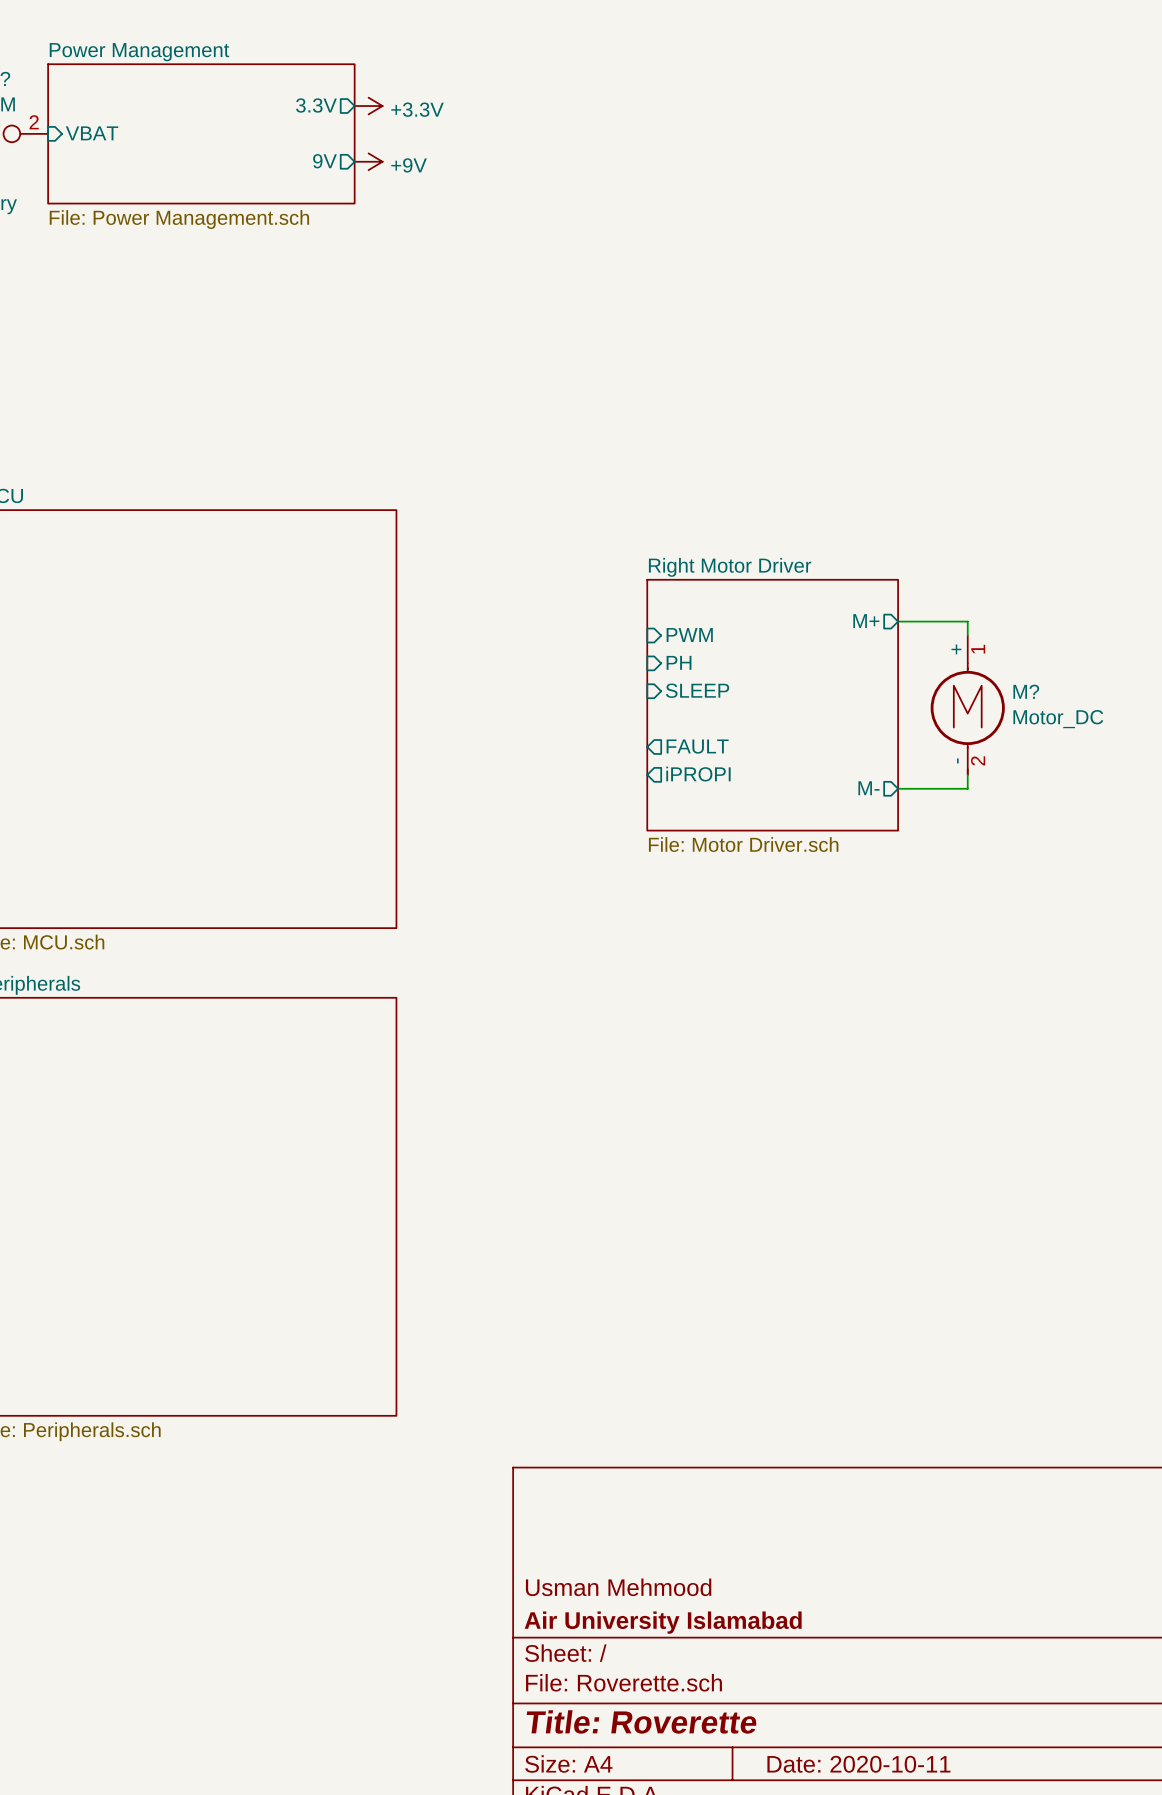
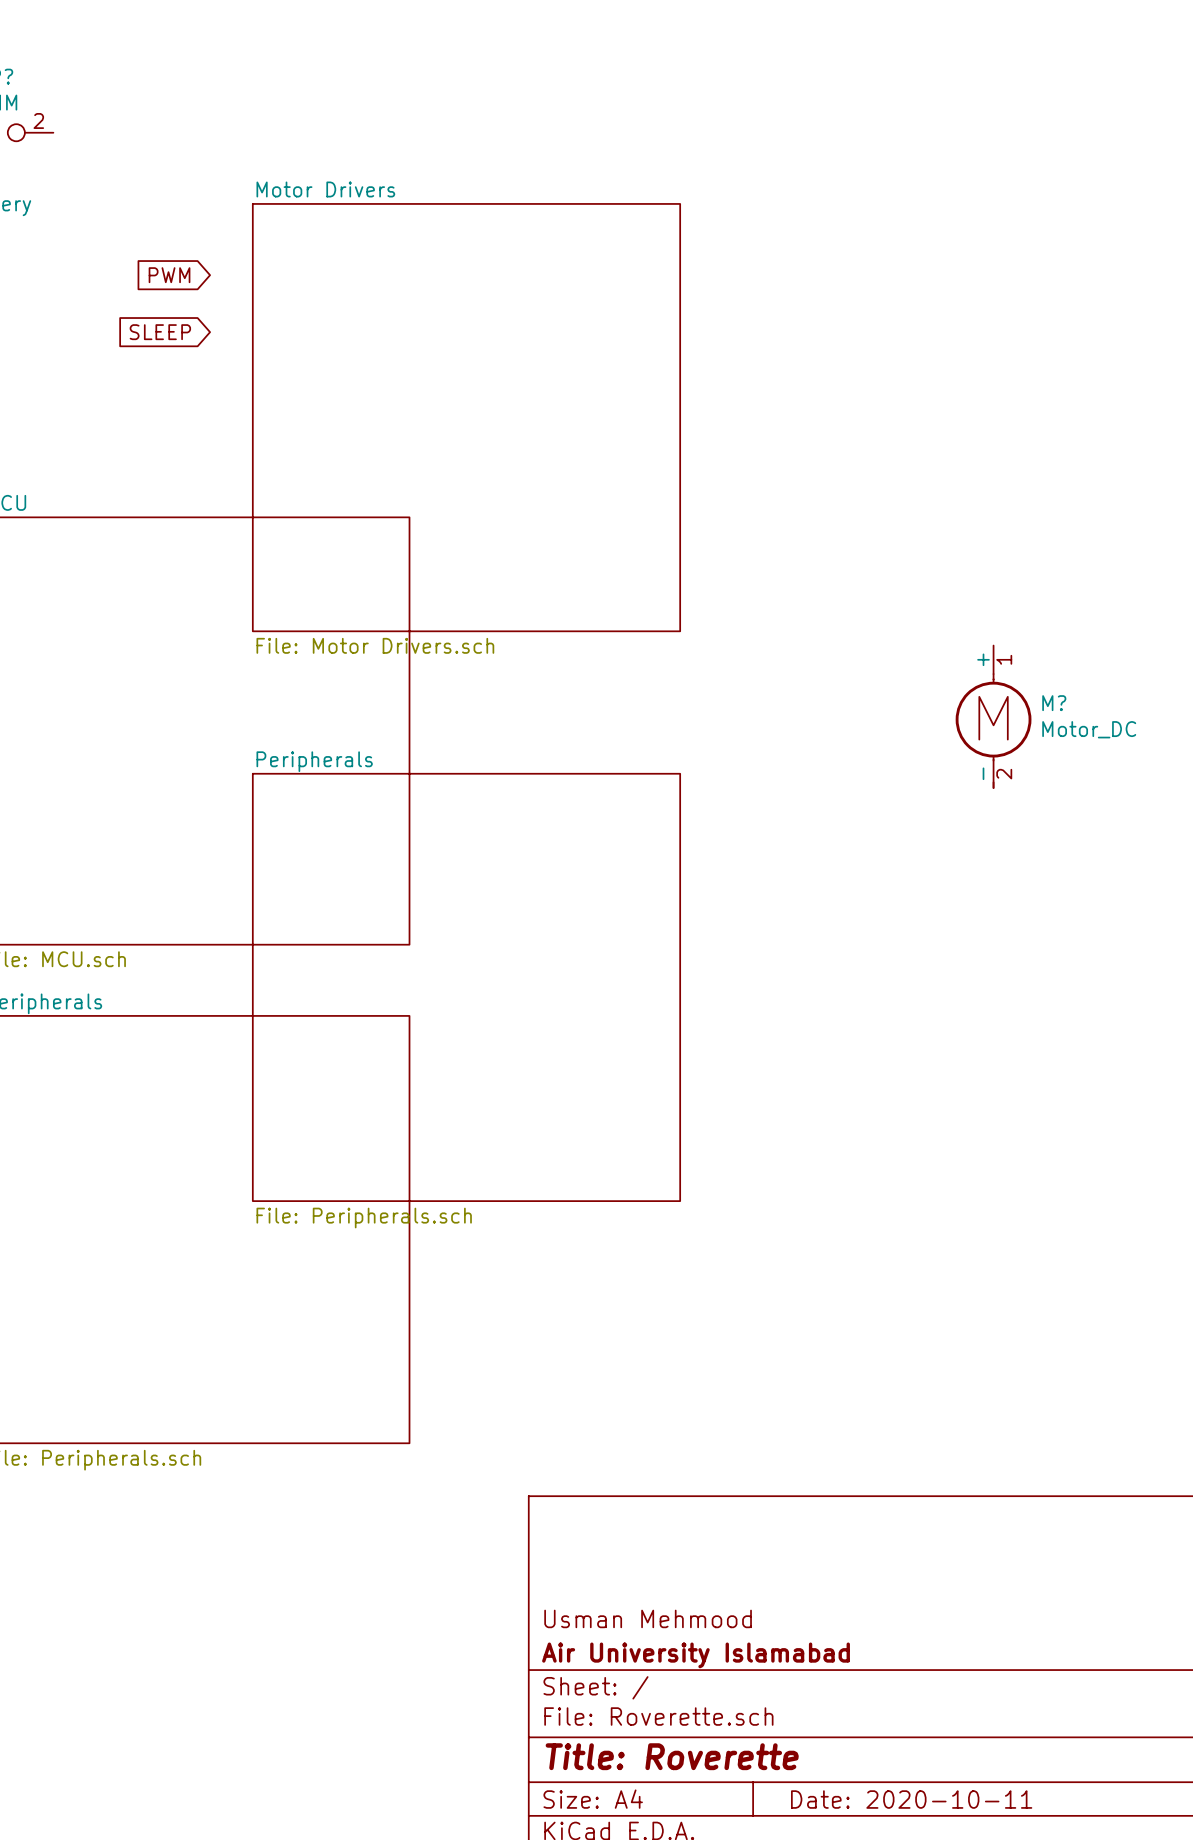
sheet pin: 3.3V (316, 105) -> none
power symbol: +3.3V (368, 106) -> none
sheet pin: VBAT (92, 133) -> none
sheet Power Management: File: Power Management.sch (201, 133) -> none
sheet pin: 9V (325, 161) -> none
power symbol: +9V (368, 161) -> none
global label: none -> PWM (169, 275)
global label: none -> SLEEP (160, 332)
sheet Motor Drivers: none -> File: Motor Drivers.sch (466, 417)
sheet pin: M+ (866, 621) -> none
wire: (898, 621) (967, 621) (967, 635) -> none
sheet pin: PWM (689, 634) -> none
sheet pin: PH (679, 662) -> none
sheet pin: SLEEP (697, 690) -> none
sheet Right Motor Driver: File: Motor Driver.sch (772, 705) -> none
sheet pin: FAULT (697, 746) -> none
sheet pin: iPROPI (698, 774) -> none
wire: (967, 774) (967, 788) (898, 788) -> none
sheet pin: M- (868, 788) -> none
sheet Peripherals: none -> File: Peripherals.sch (466, 987)

